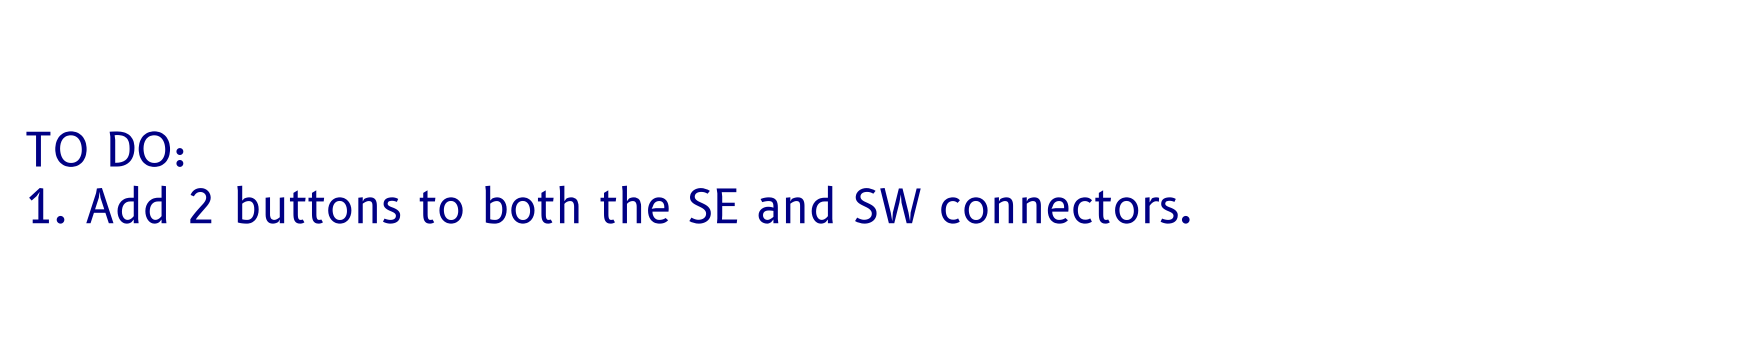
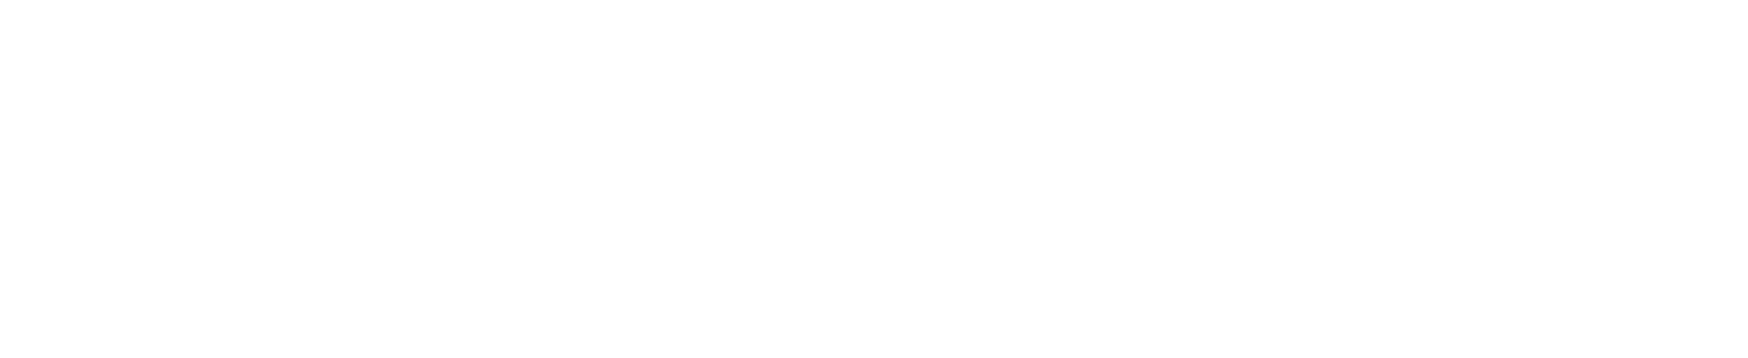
text: TO DO: (104, 149) -> none
text: 1. Add 2 buttons to both the SE and SW connectors. (609, 204) -> none

